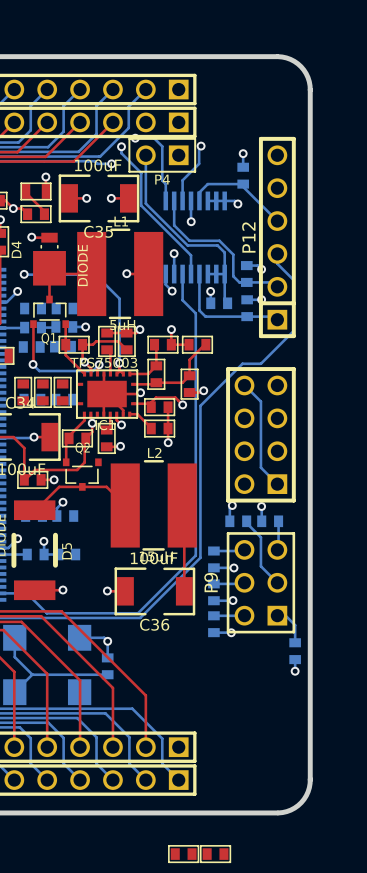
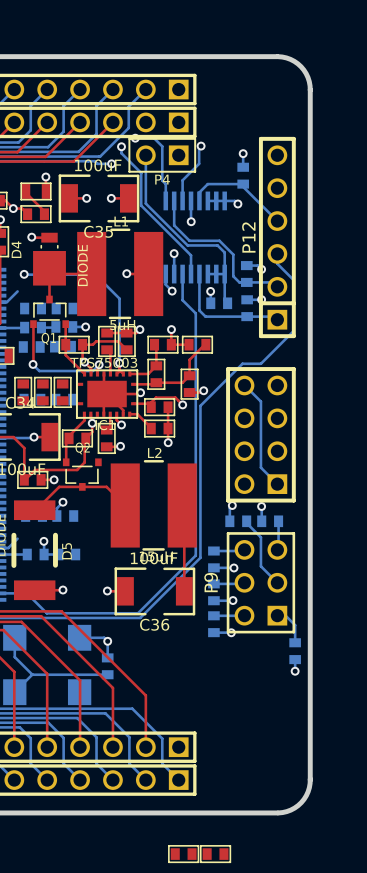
via: (17, 291) -> none
via: (17, 538) -> none

